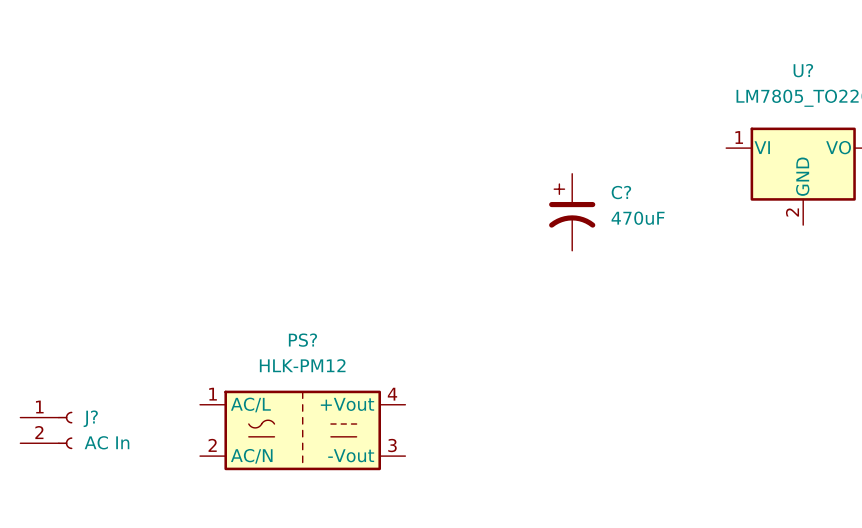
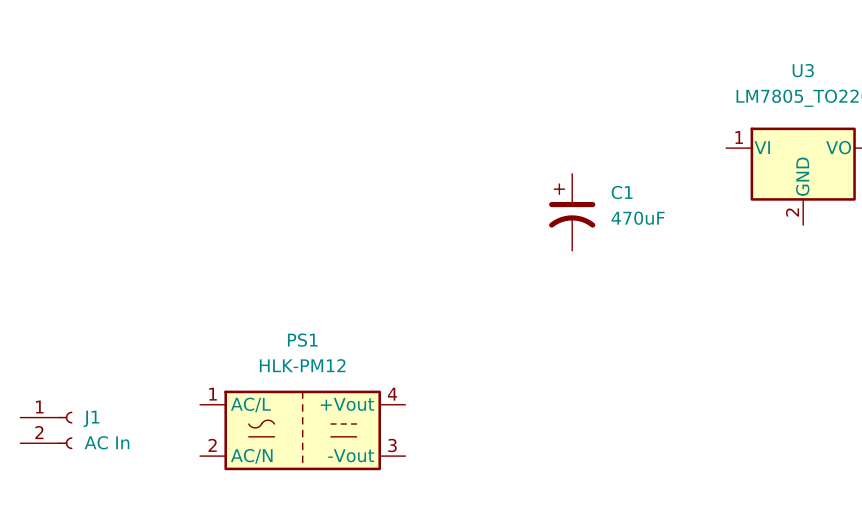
U? name: U? (803, 70) -> U3 (803, 70)
C? name: C? (621, 192) -> C1 (622, 192)
PS? name: PS? (302, 340) -> PS1 (302, 340)
J? name: J? (90, 418) -> J1 (91, 418)

